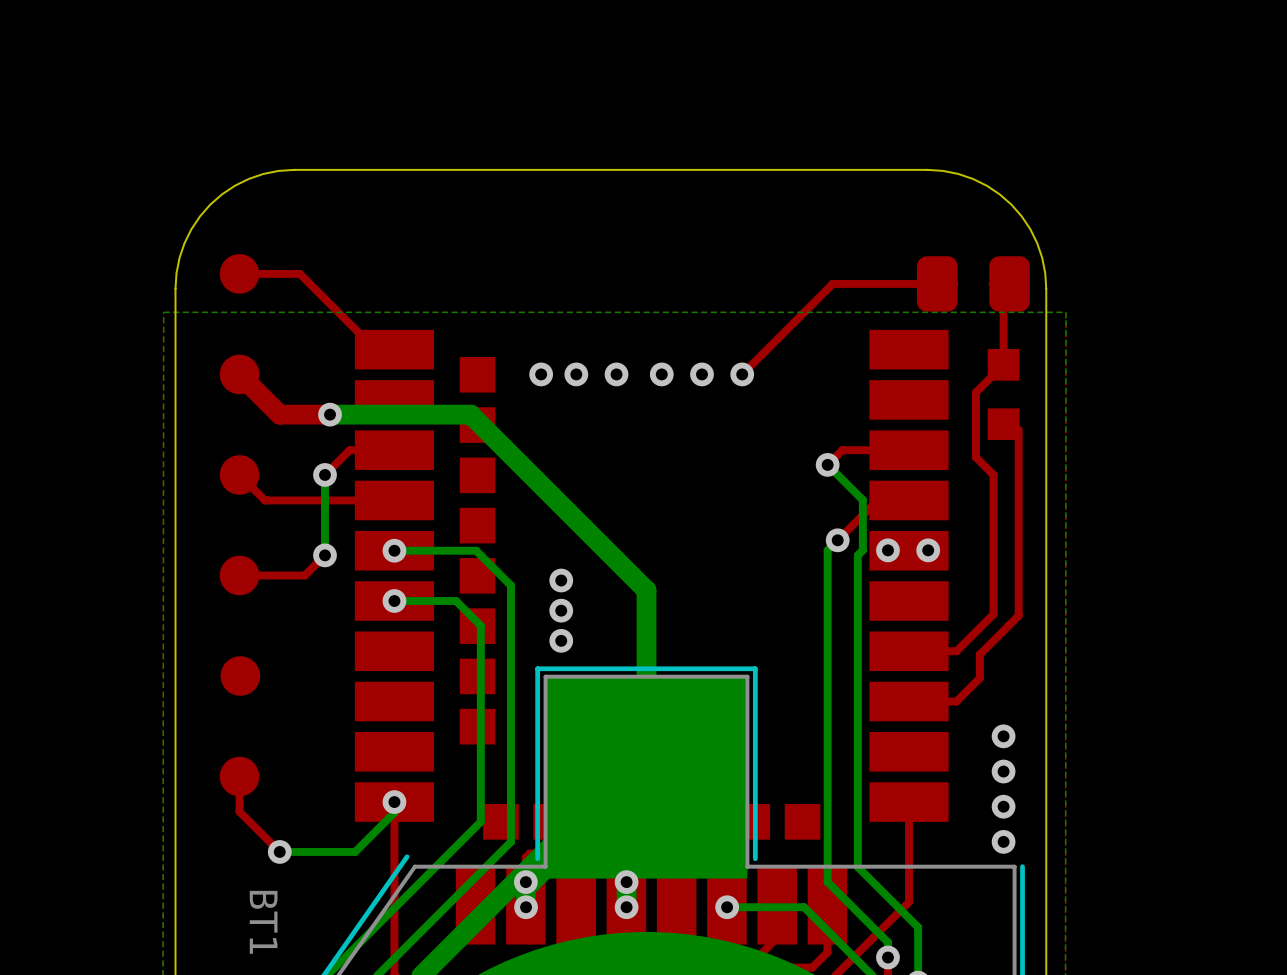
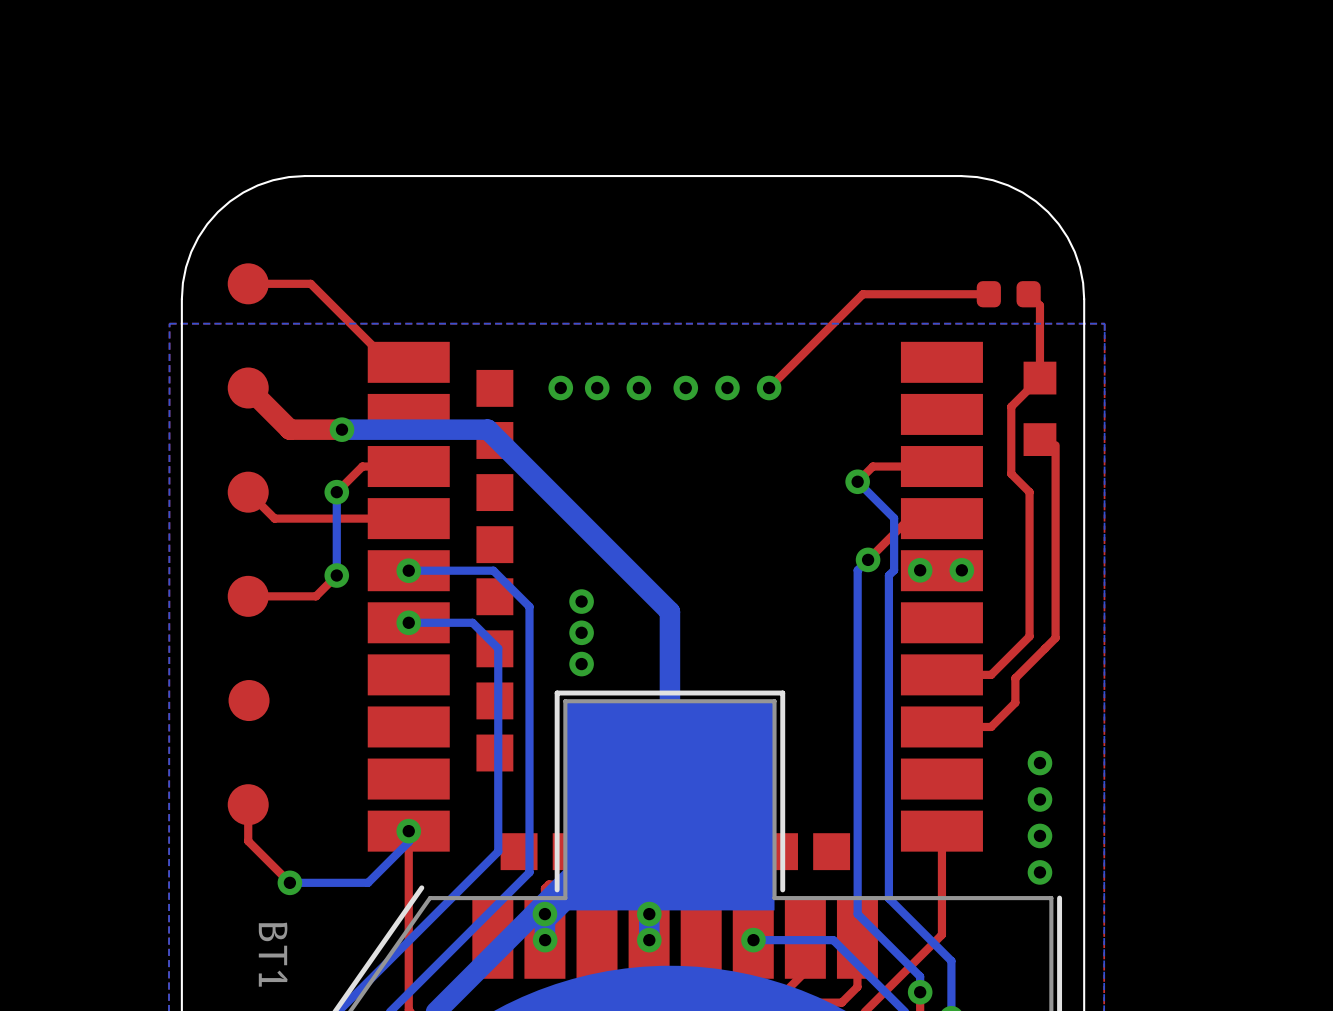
part footprint: [917, 256, 1030, 312] -> [976, 281, 1041, 308]

